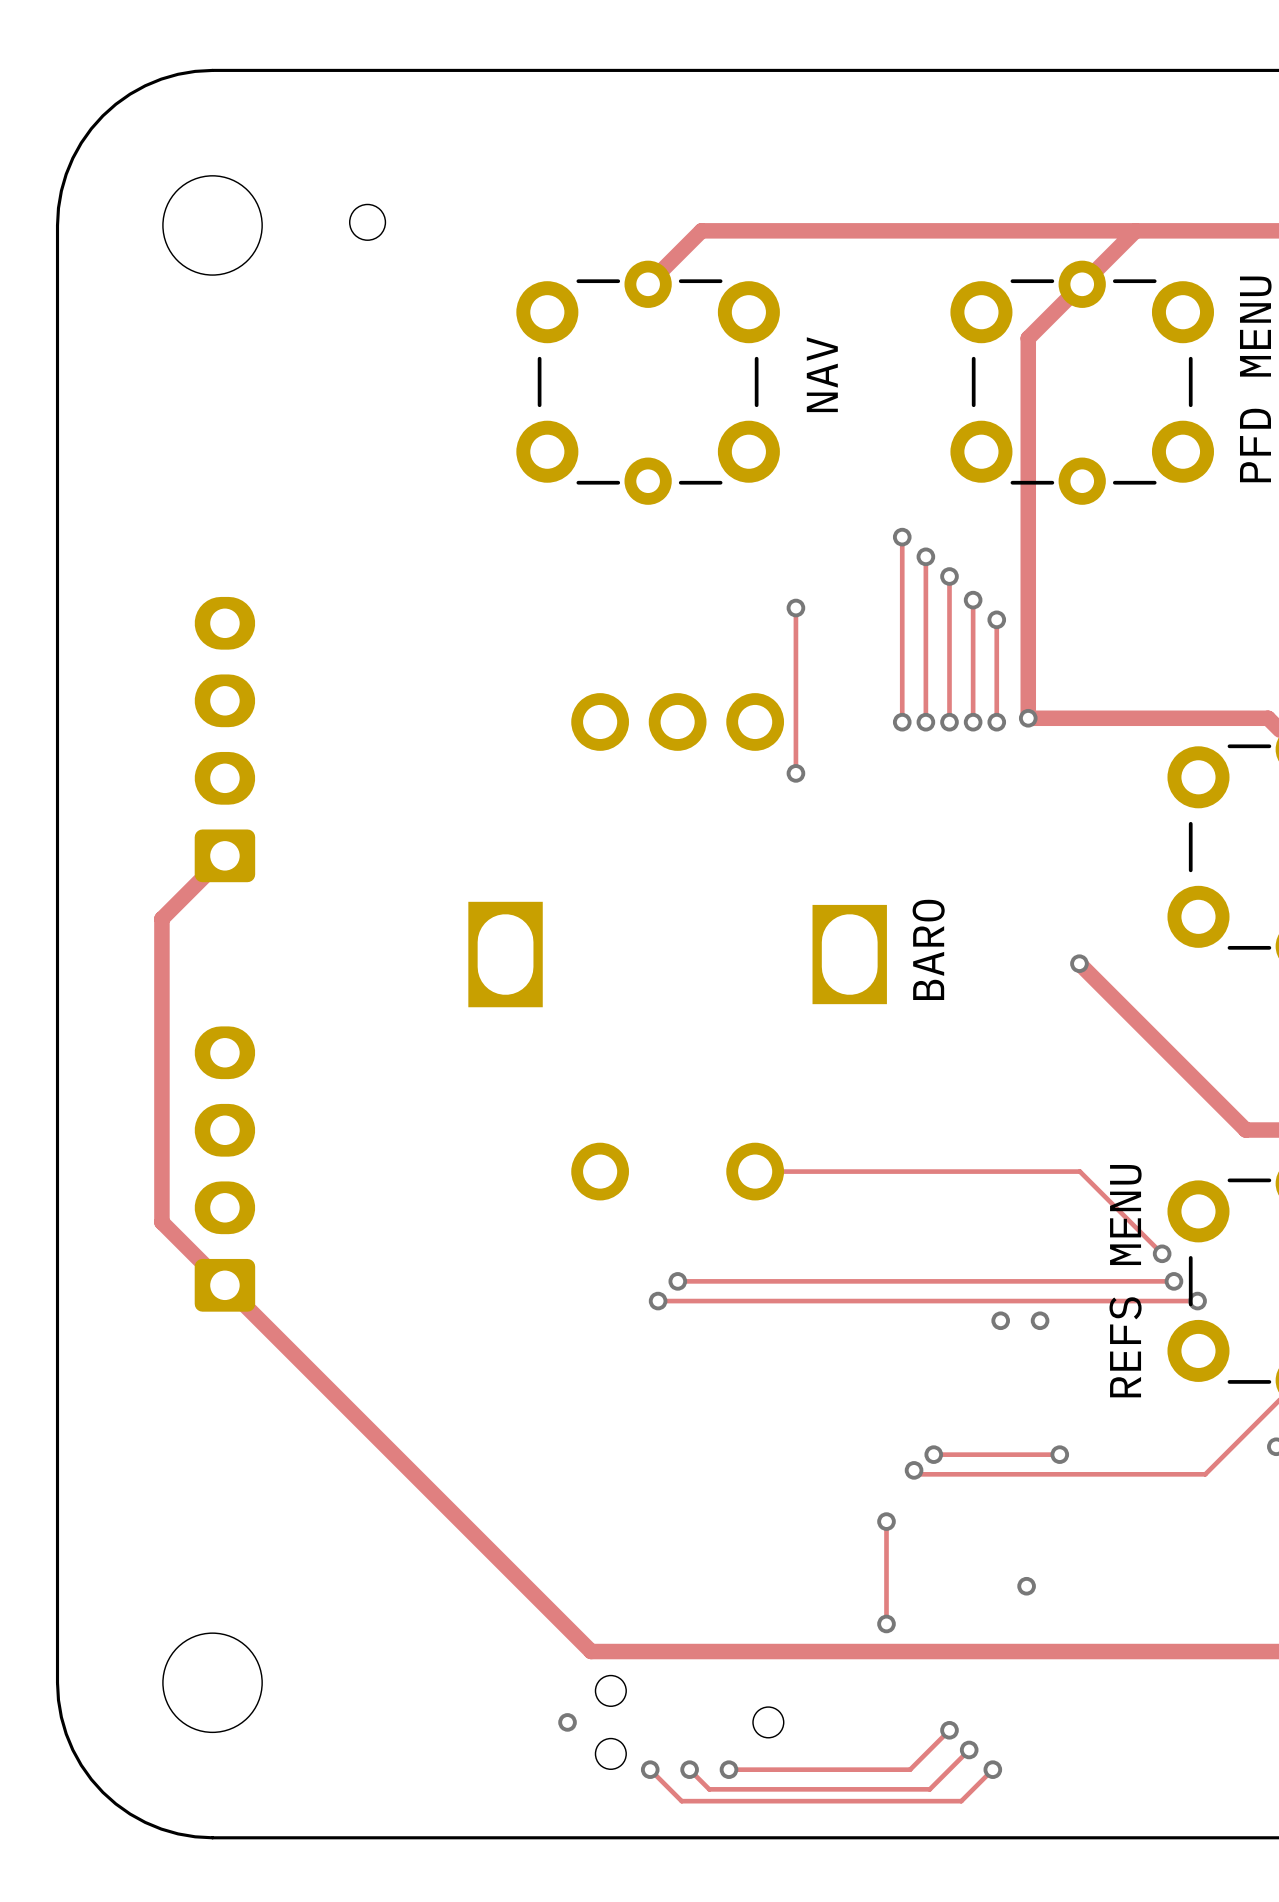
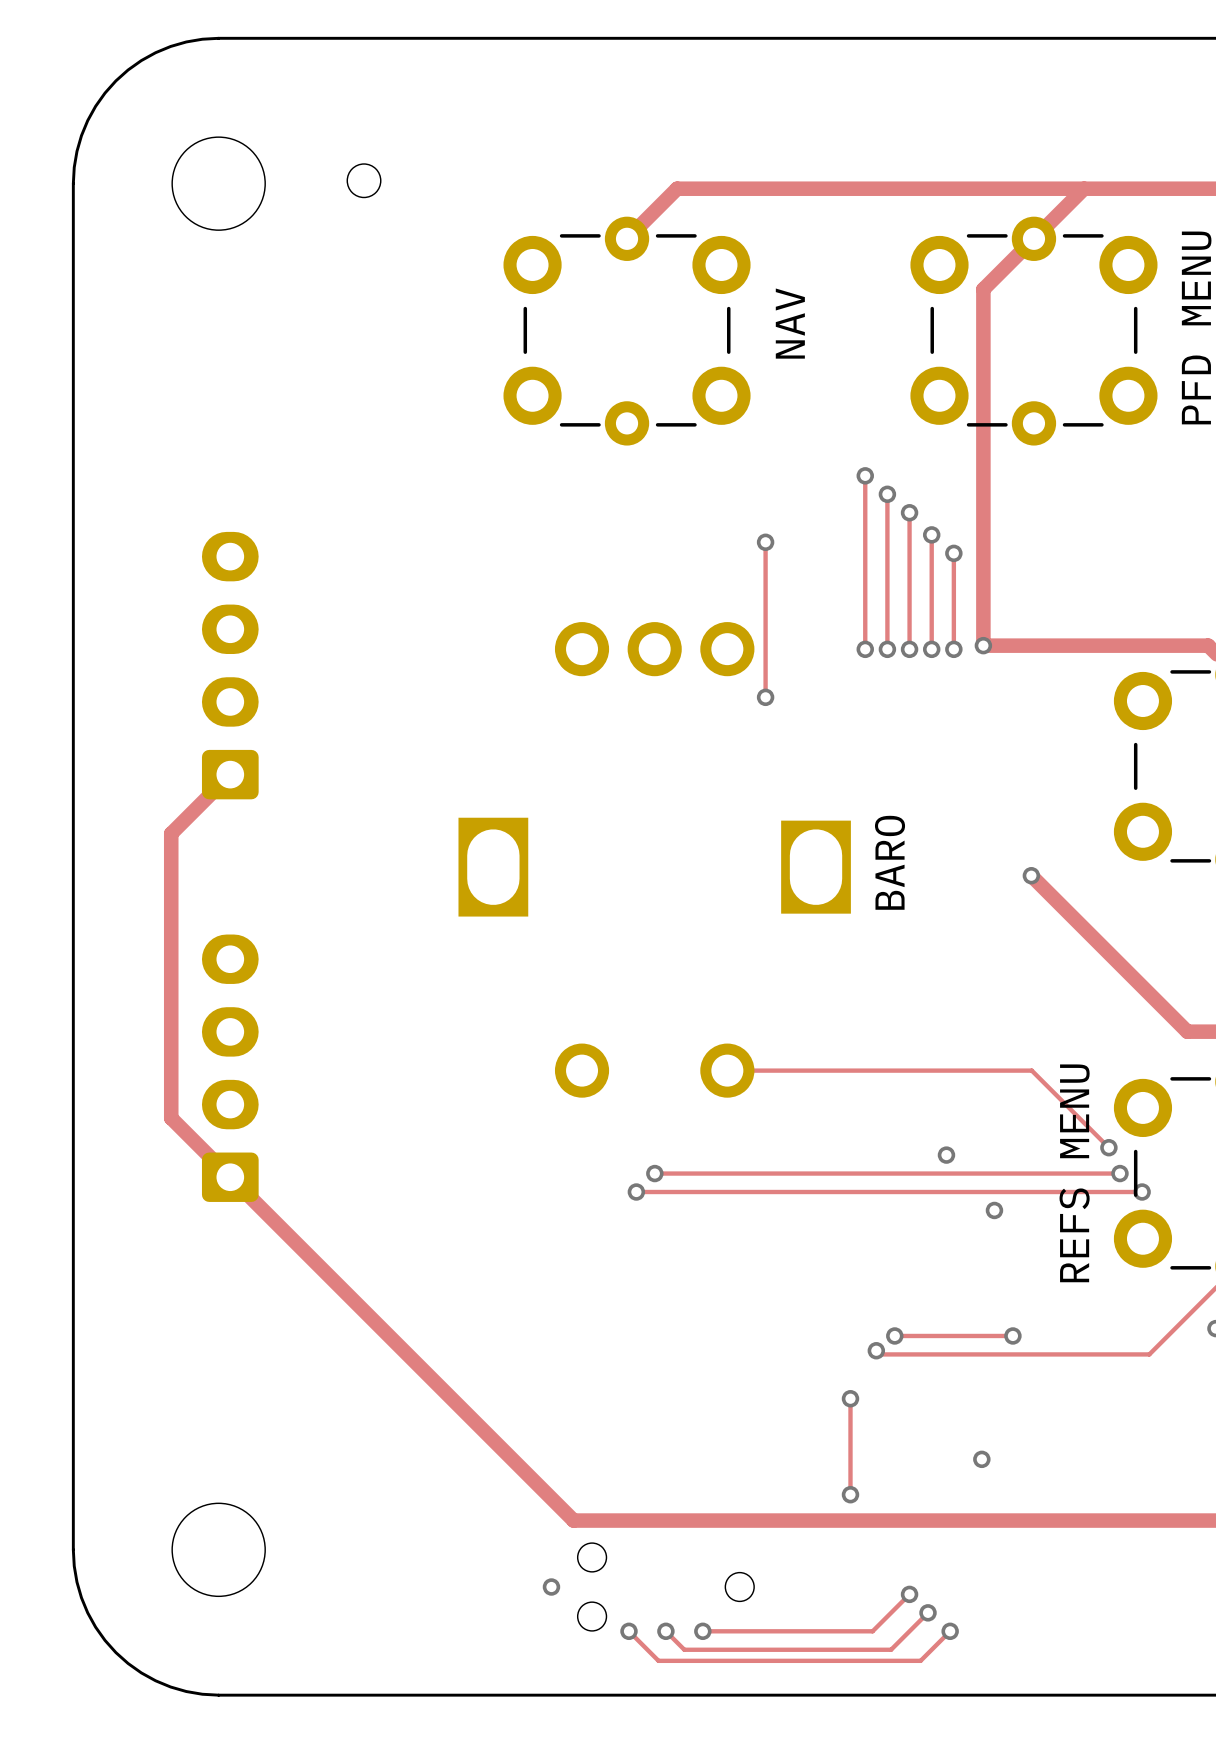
via position: (1000, 1320) -> (946, 1155)

